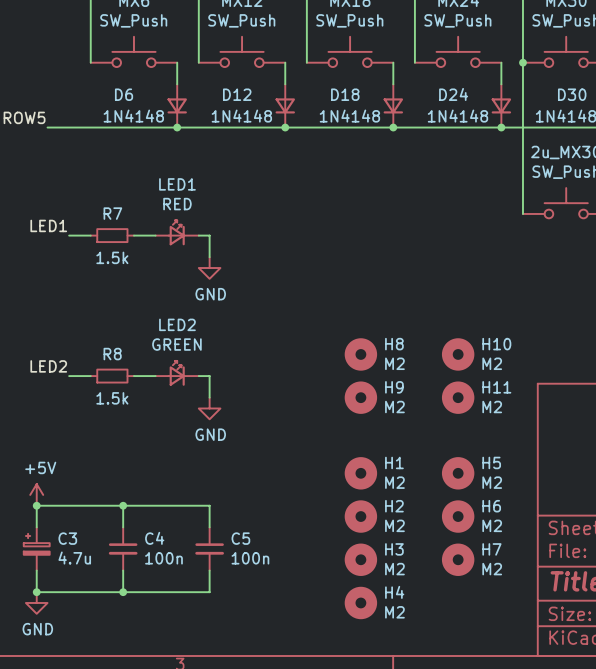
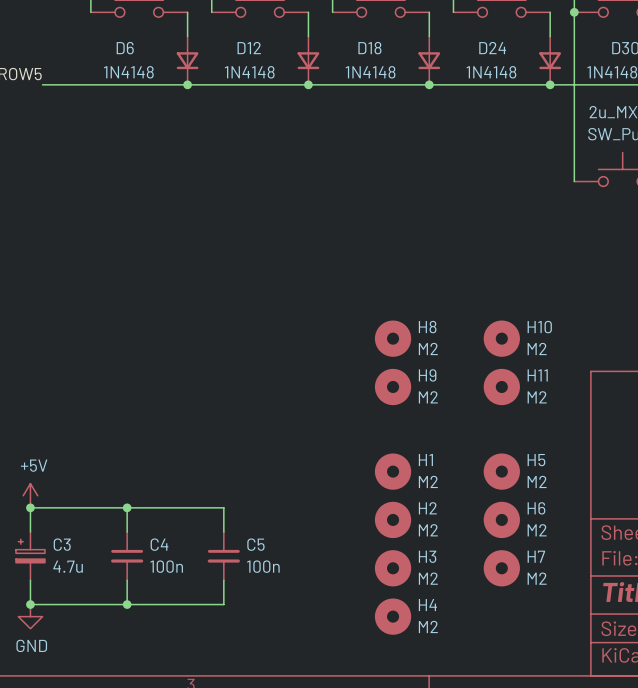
label: LED1 (48, 225) -> none
LED1: RED (177, 232) -> none
wire: (69, 235) (90, 235) -> none
R7: 1.5k (112, 235) -> none
wire: (133, 235) (155, 235) -> none
wire: (198, 235) (209, 235) (209, 257) -> none
power symbol: GND (209, 268) -> none
label: LED2 (48, 366) -> none
LED2: GREEN (177, 373) -> none
wire: (69, 376) (90, 376) -> none
R8: 1.5k (112, 376) -> none
wire: (133, 376) (155, 376) -> none
wire: (198, 376) (209, 376) (209, 397) -> none
power symbol: GND (209, 408) -> none

